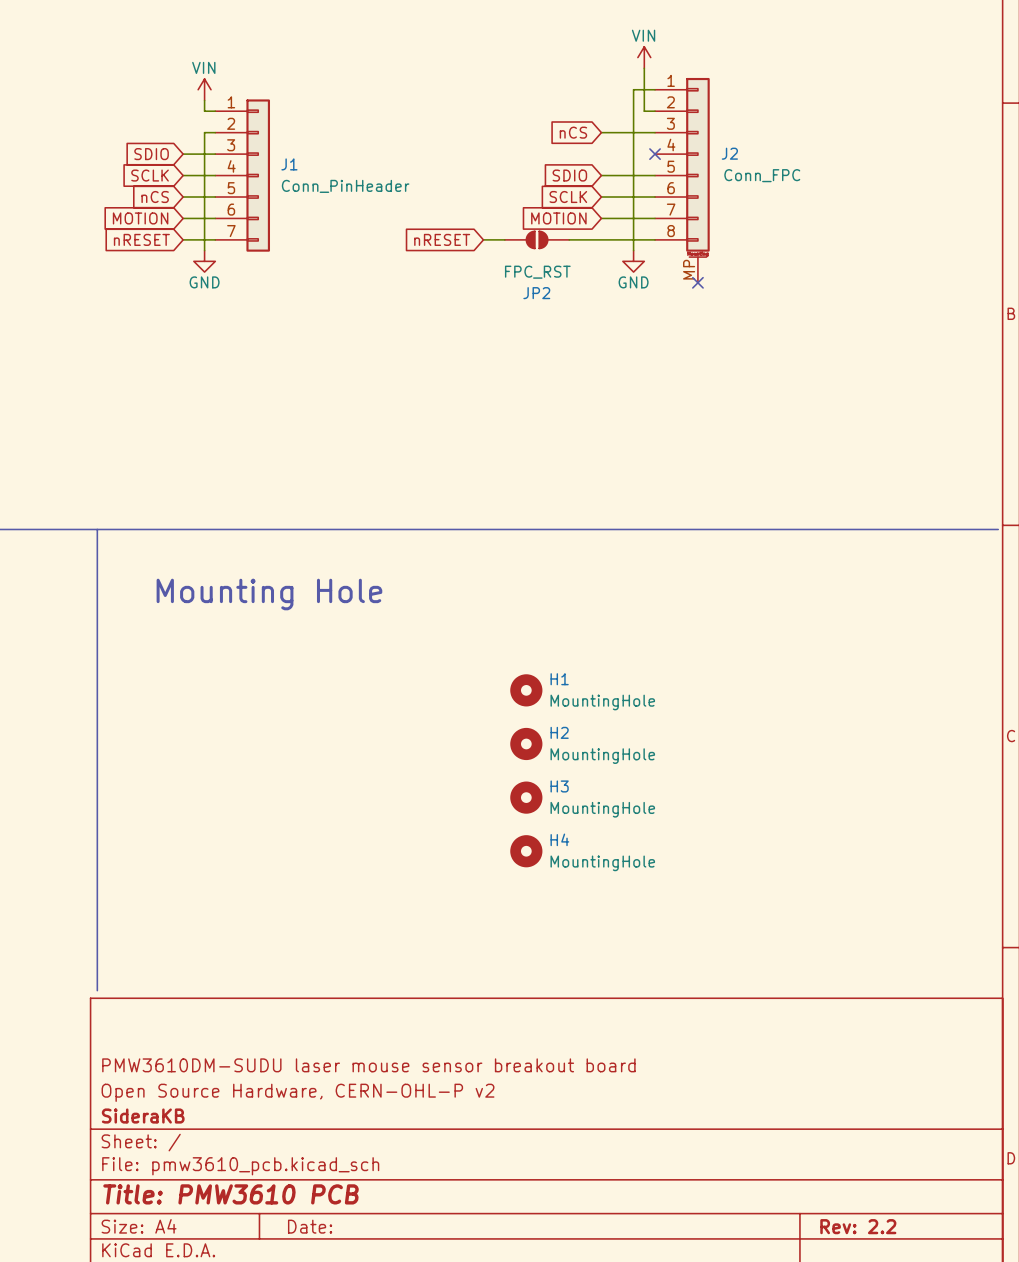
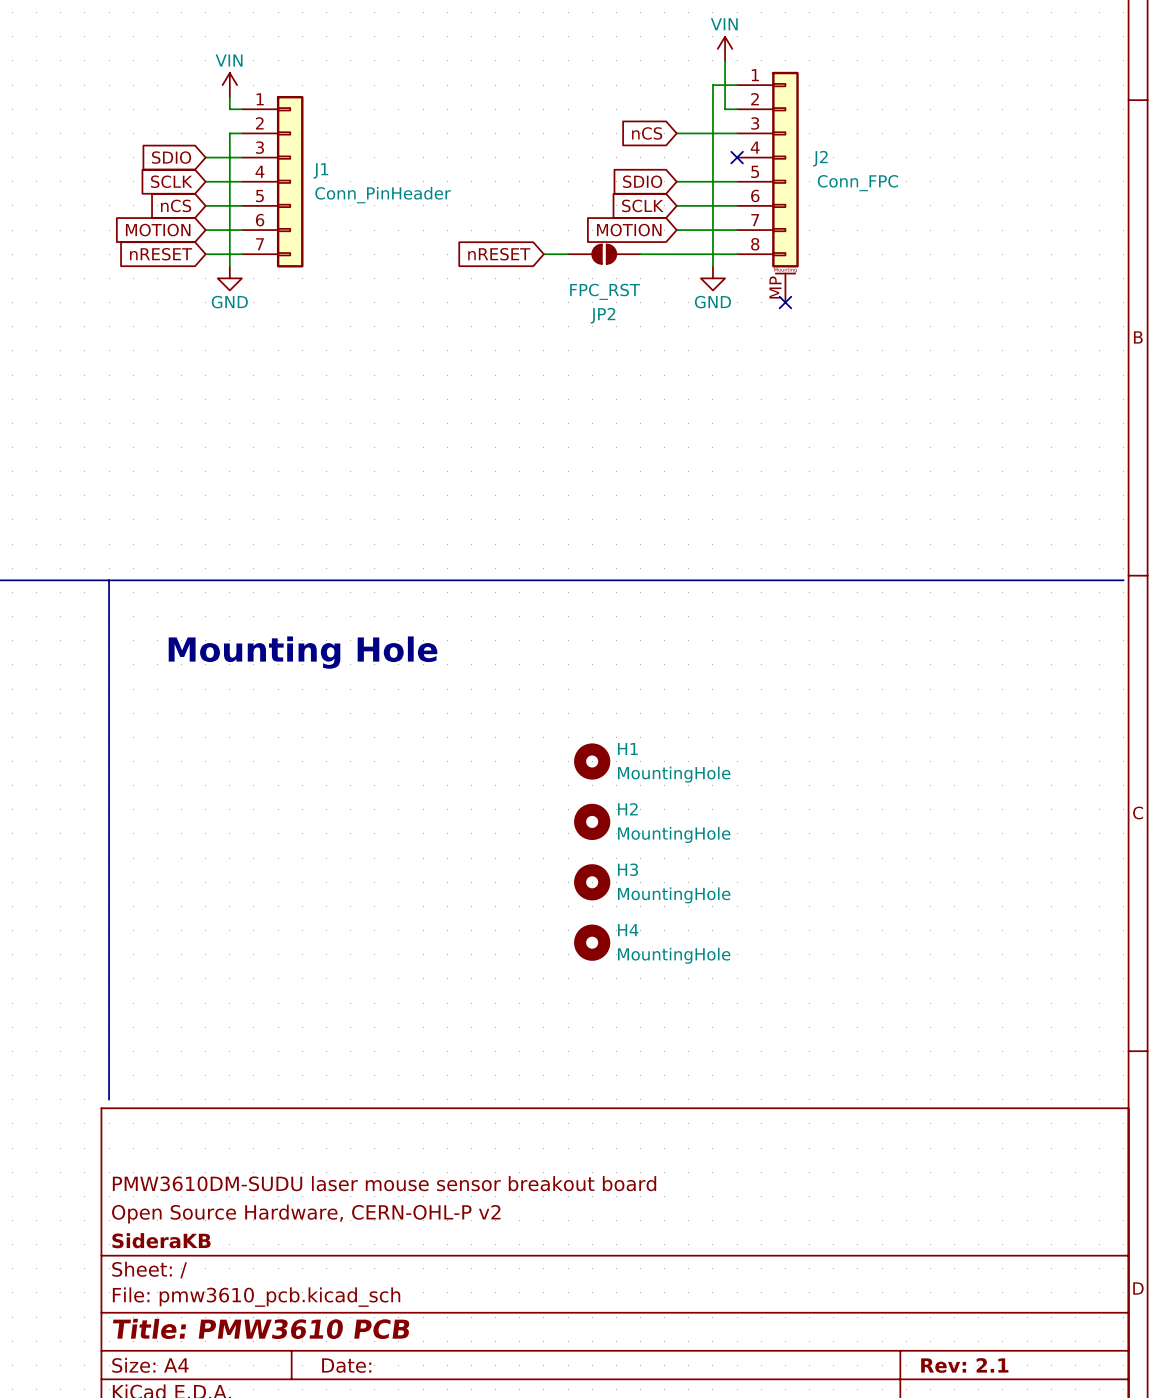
title block: Rev: 2.2 (858, 1226) -> Rev: 2.1 (964, 1365)

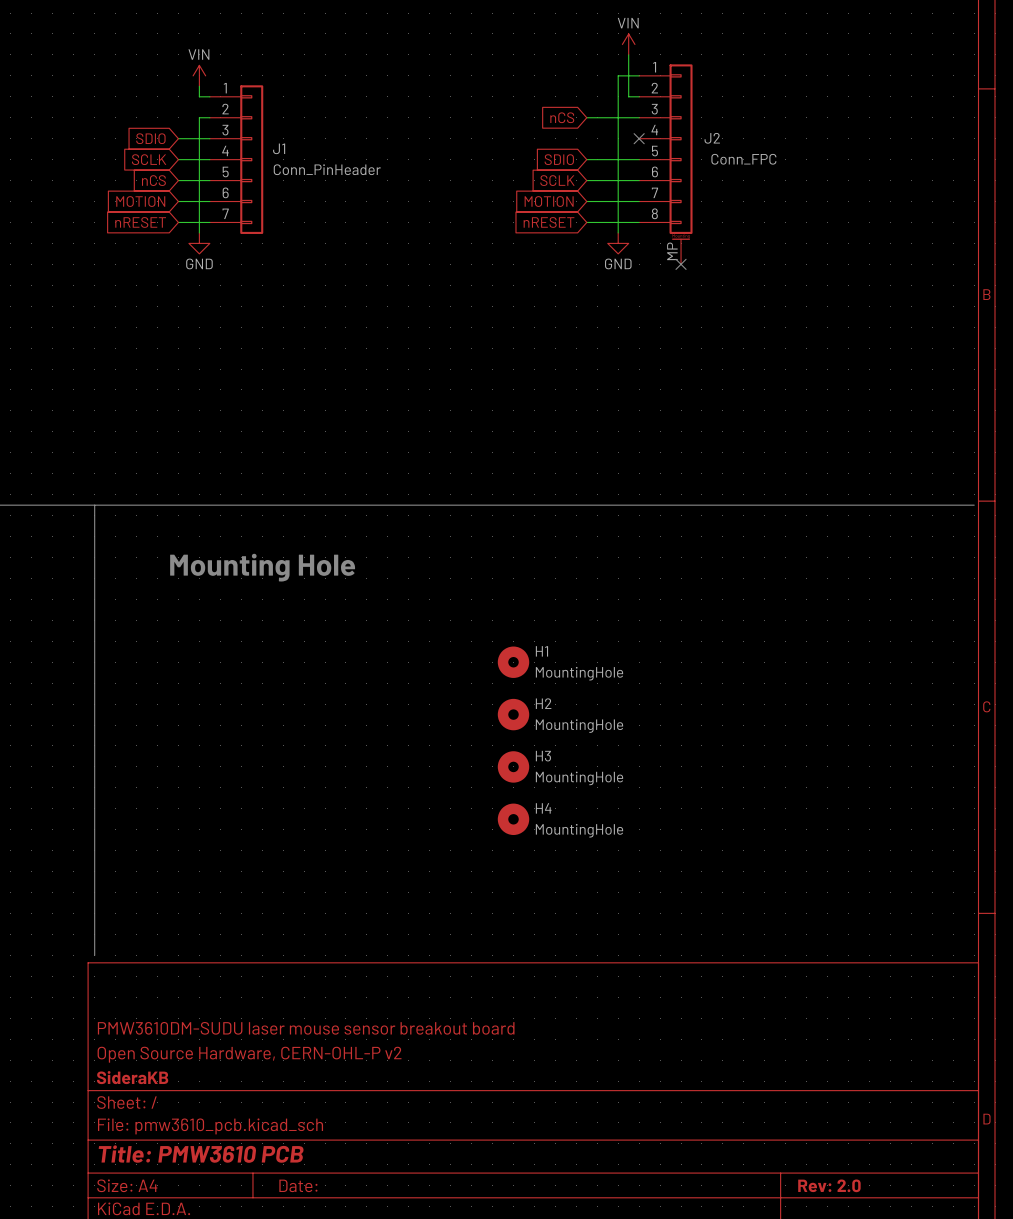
global label position: nRESET (499, 254) -> nRESET (549, 222)
wire: (543, 254) (568, 254) -> none
JP2: FPC_RST (604, 254) -> none
wire: (640, 254) (676, 254) -> none
title block: Rev: 2.1 (964, 1365) -> Rev: 2.0 (829, 1185)

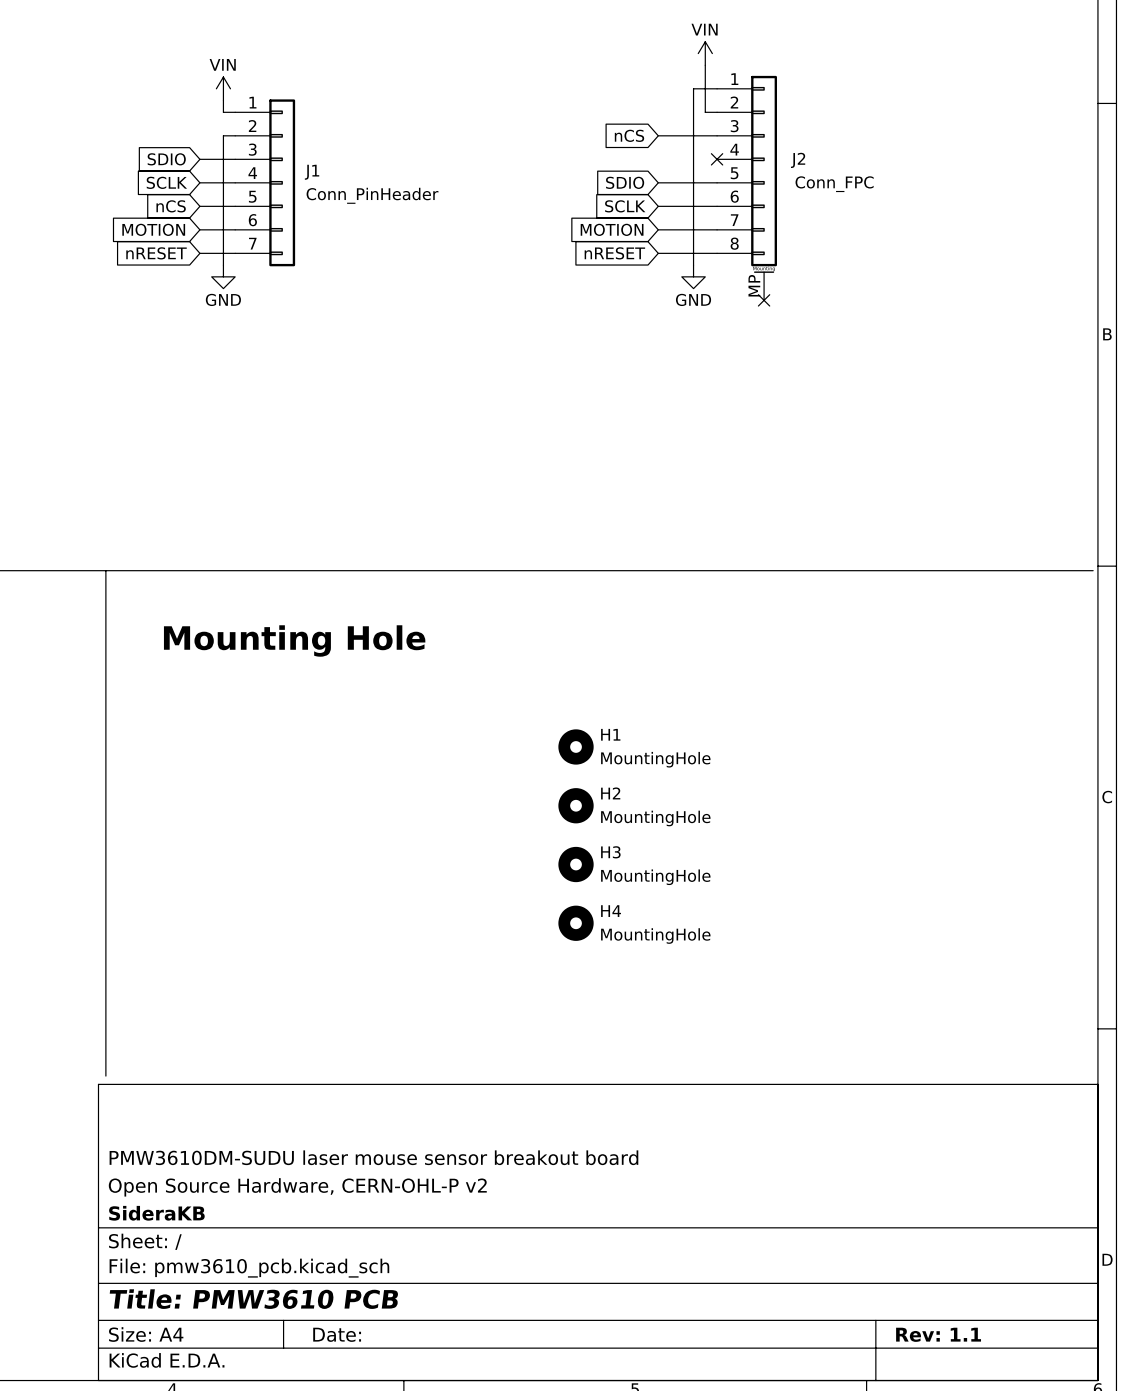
title block: Rev: 2.0 (829, 1185) -> Rev: 1.1 (938, 1334)

